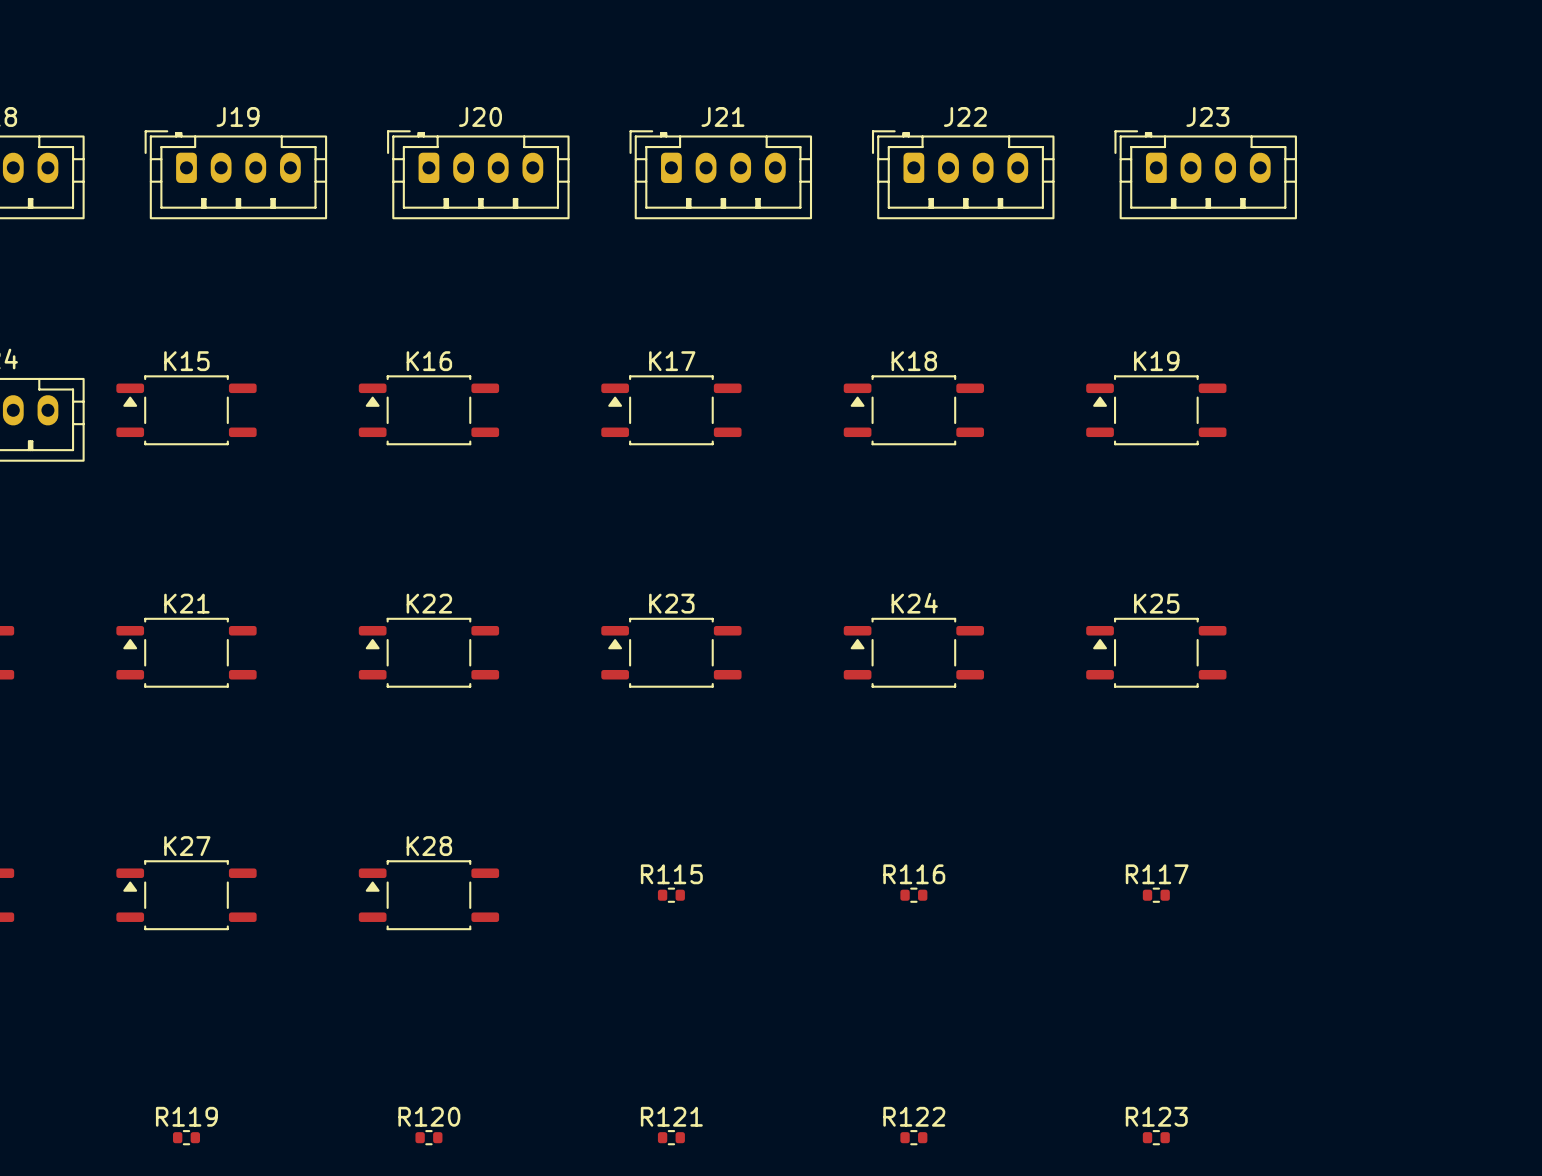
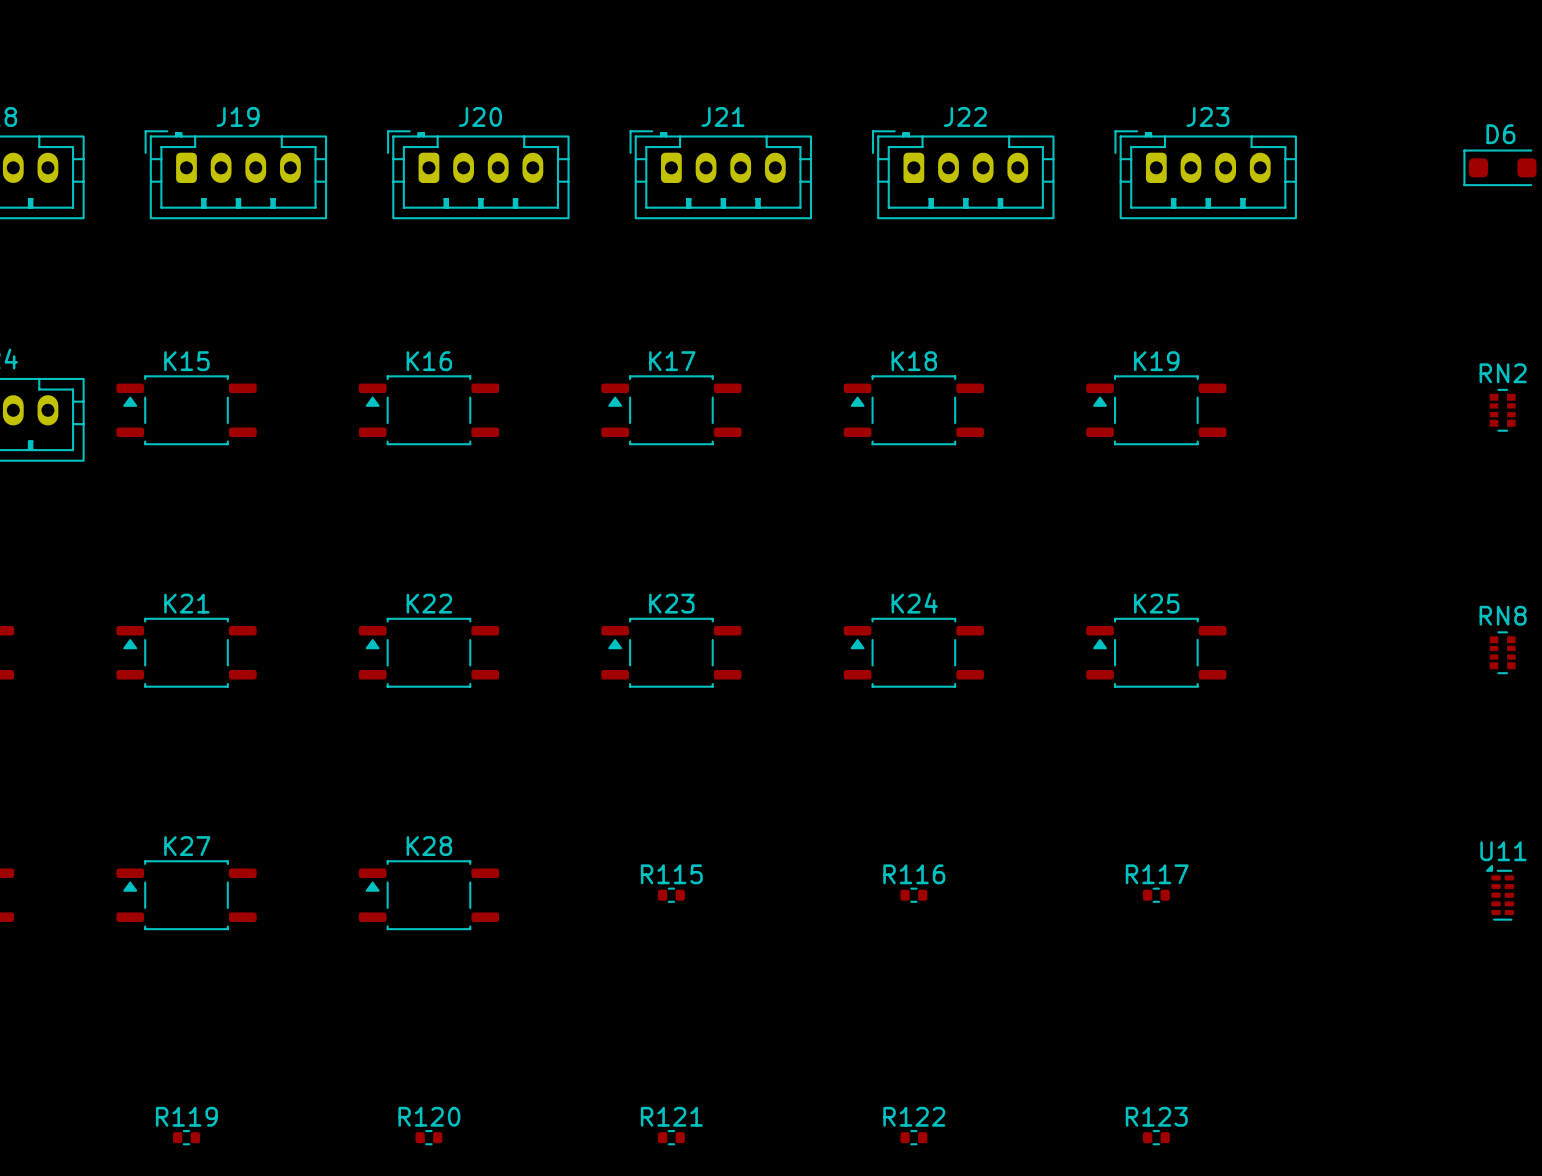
D6: none -> (1499, 167)
RN2: none -> (1502, 410)
RN8: none -> (1502, 652)
U11: none -> (1500, 892)

